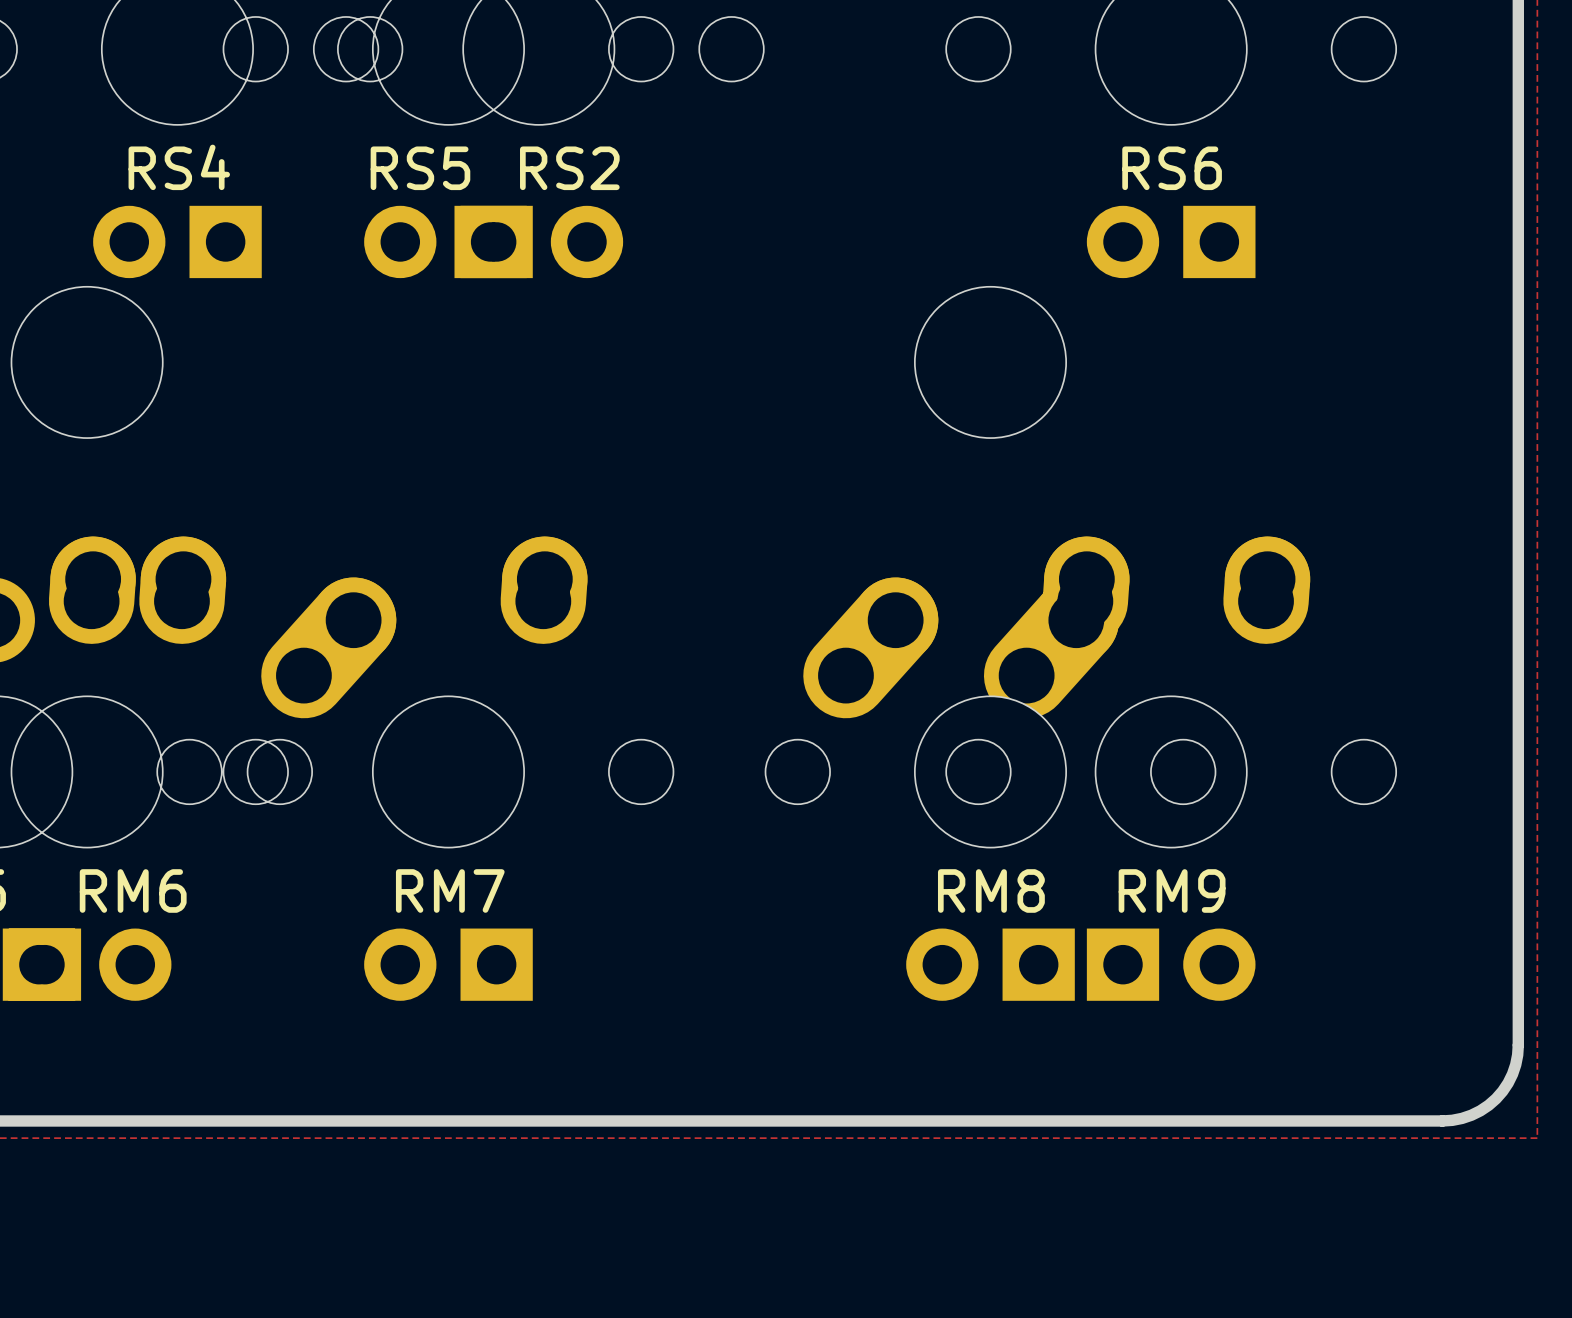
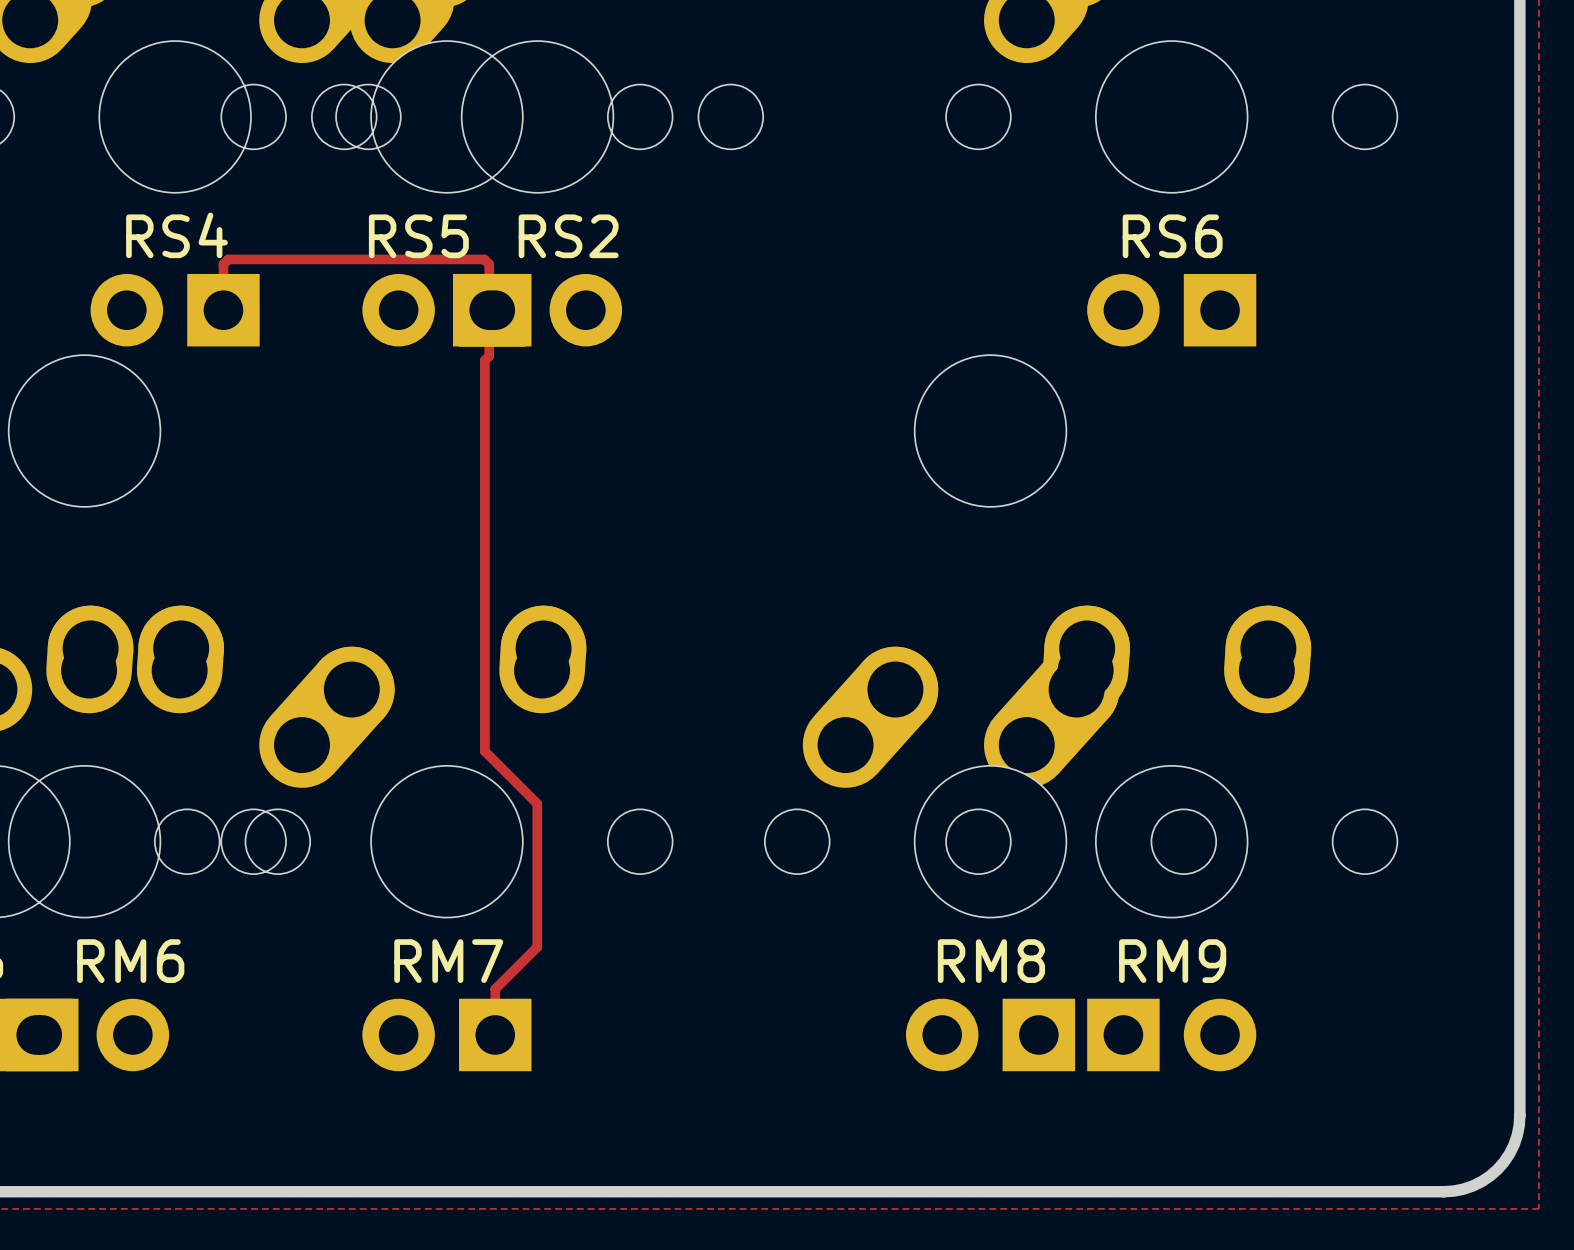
track: none -> (223, 310) (223, 264) (228, 259) (484, 259) (489, 264) (489, 356) (484, 360) (484, 751) (537, 803) (537, 947) (495, 989) (495, 1034)

